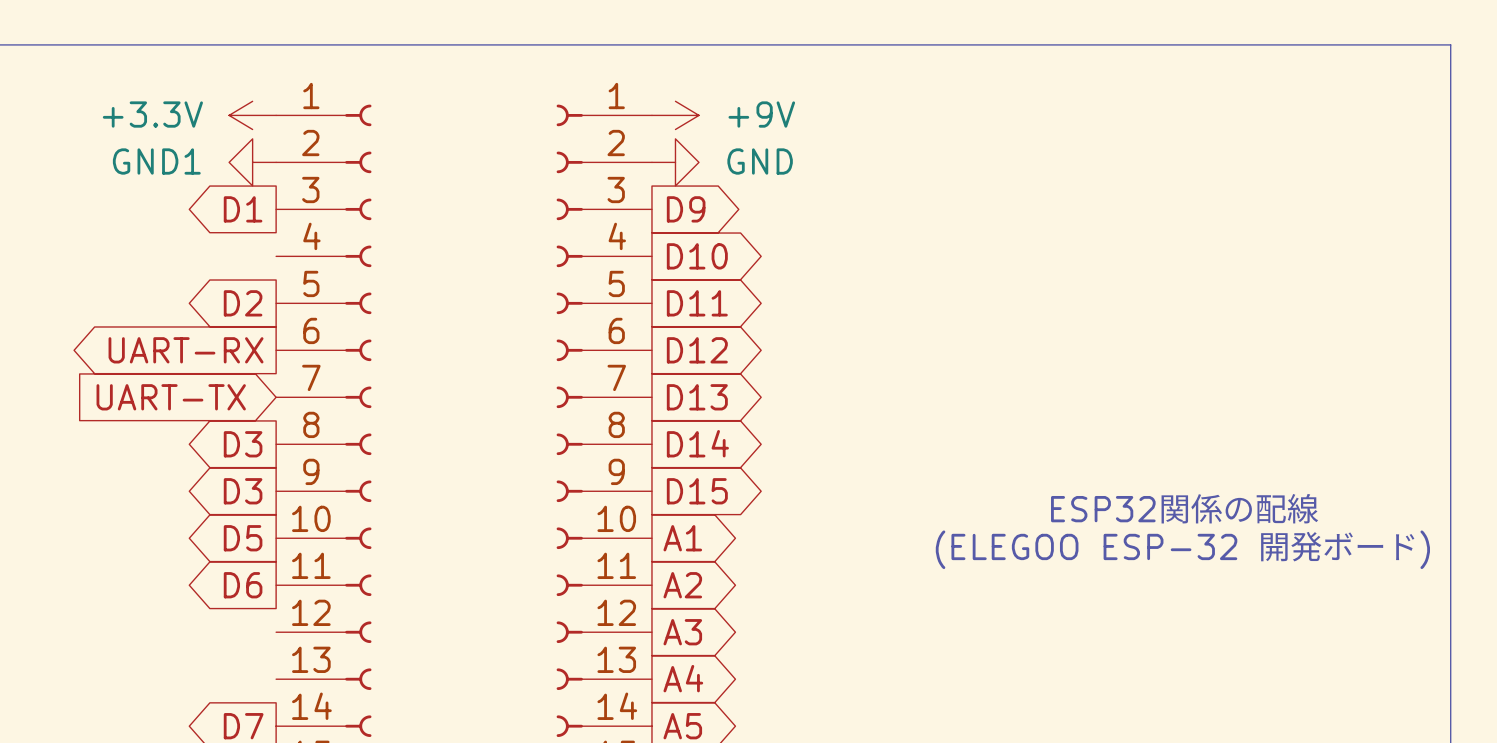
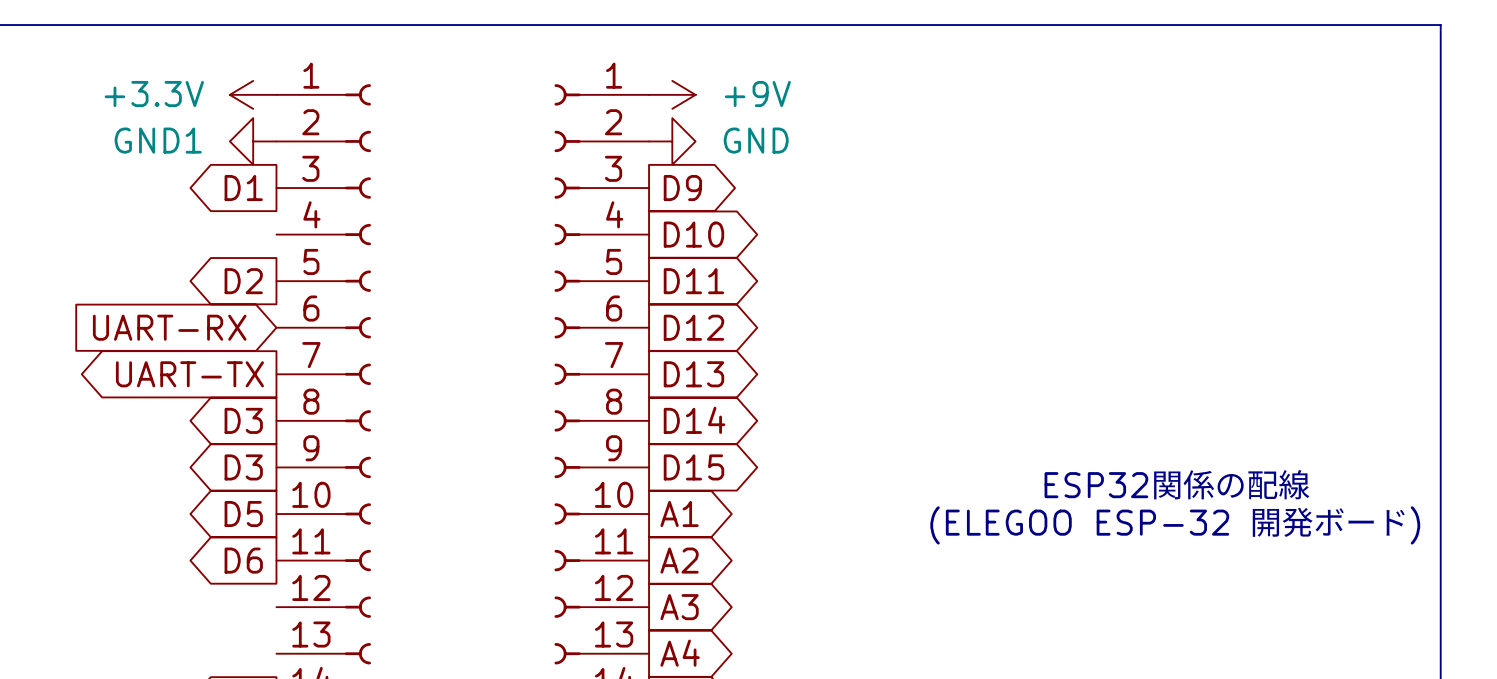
global label shape: output (186, 350) -> input (169, 327)
global label shape: input (171, 397) -> output (189, 374)

